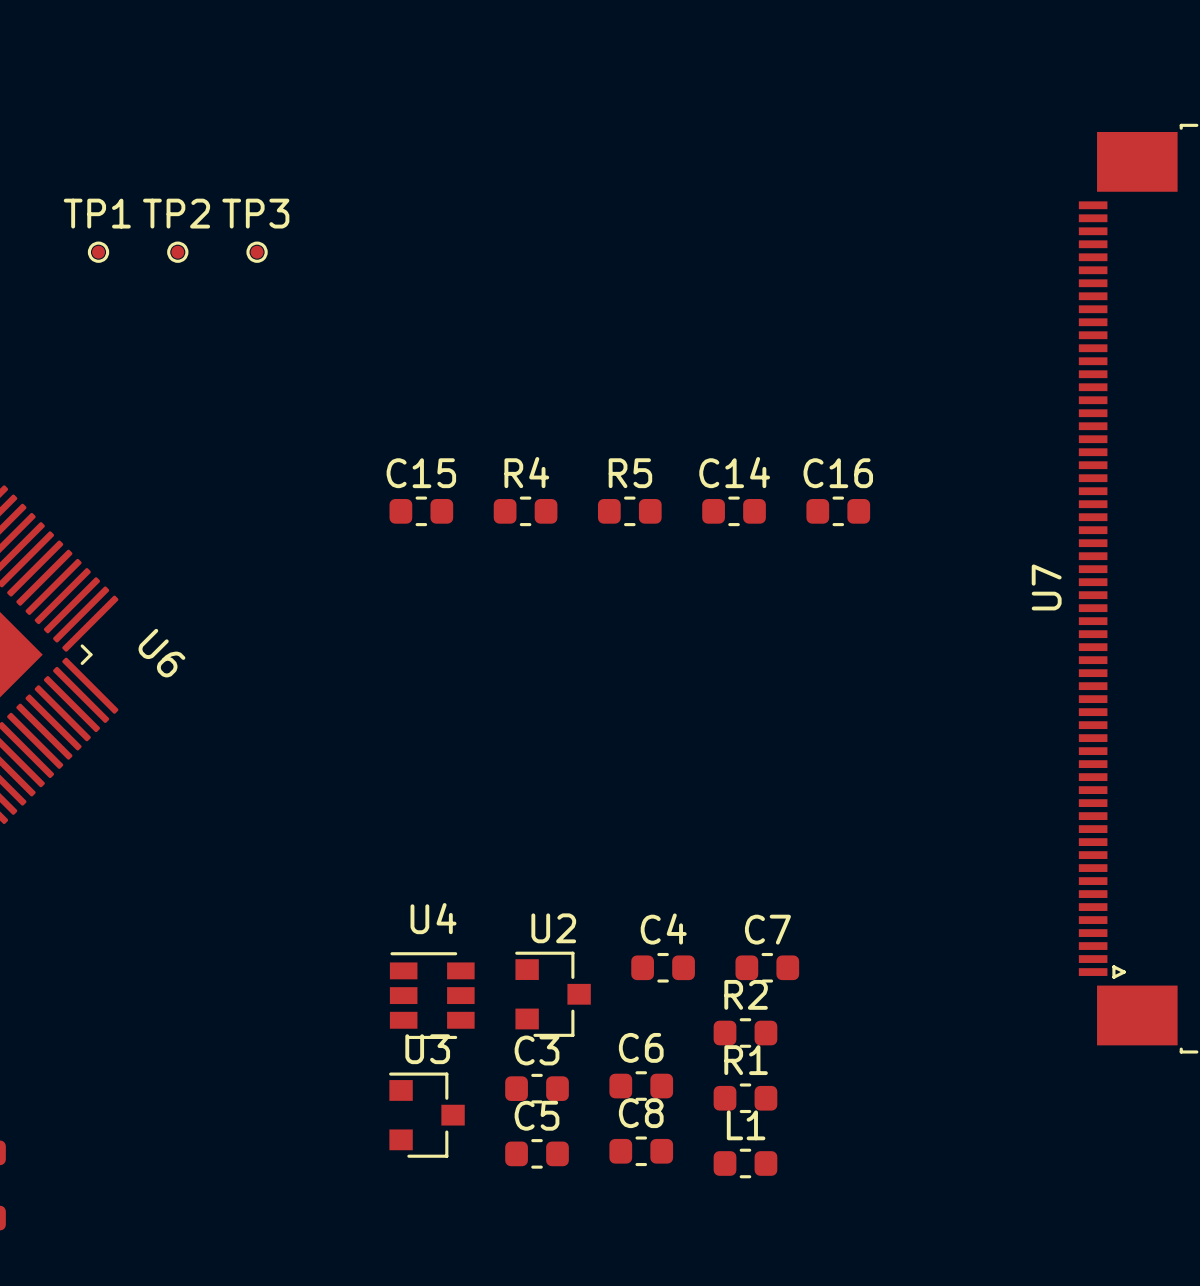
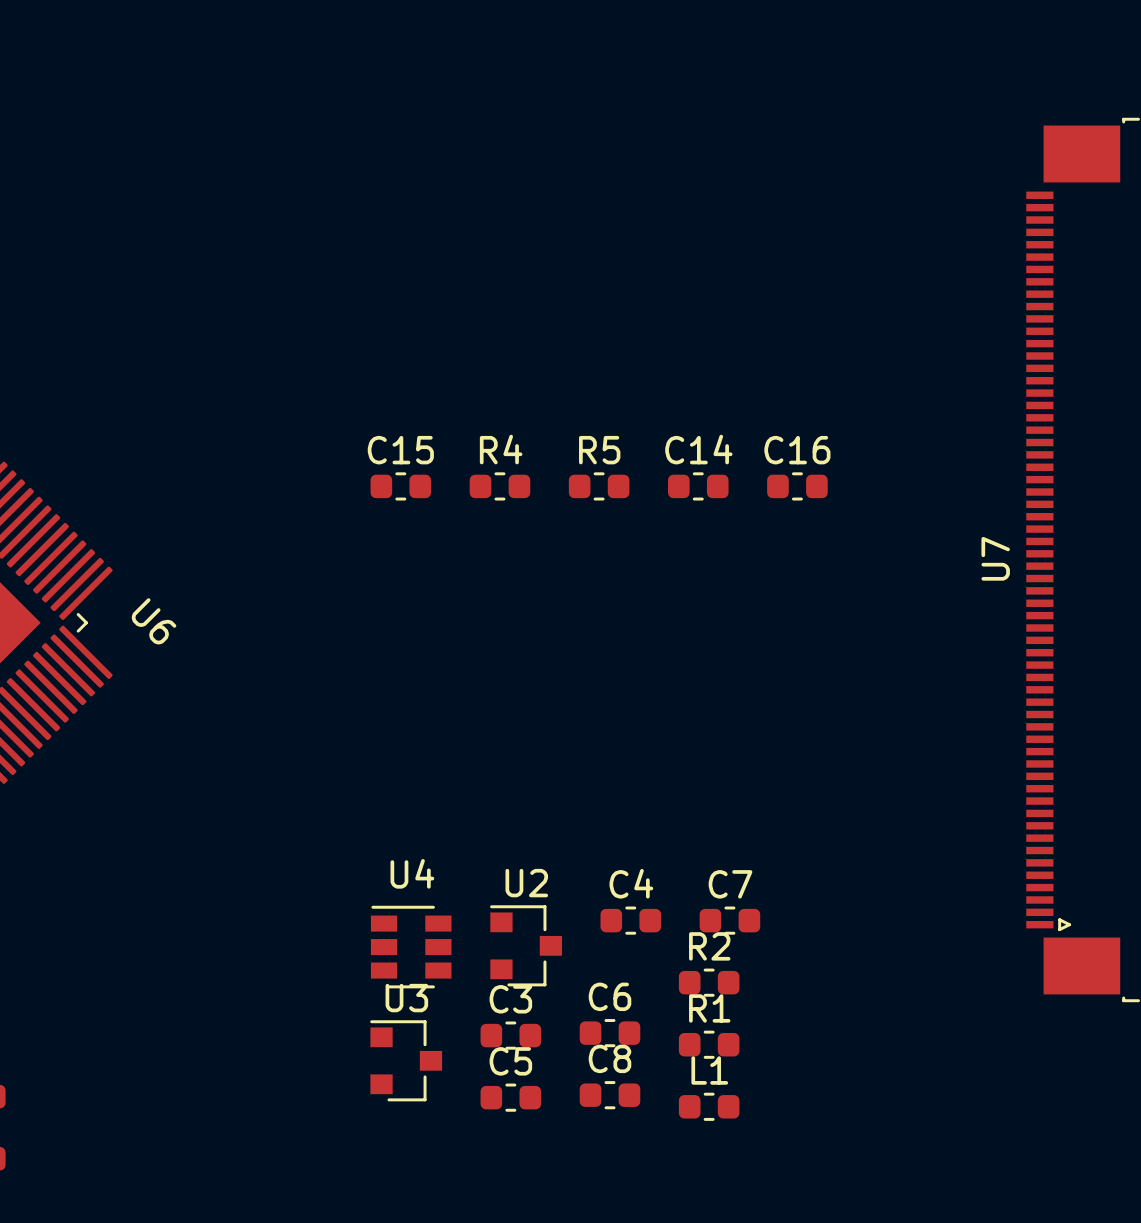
TP1: (98, 252) -> none
TP2: (177, 252) -> none
TP3: (257, 252) -> none

